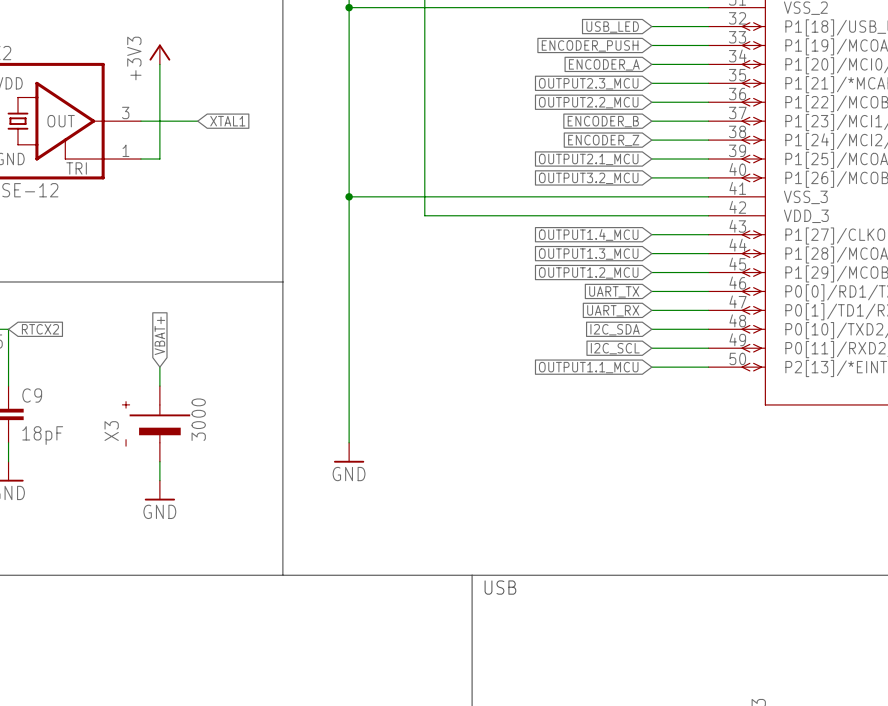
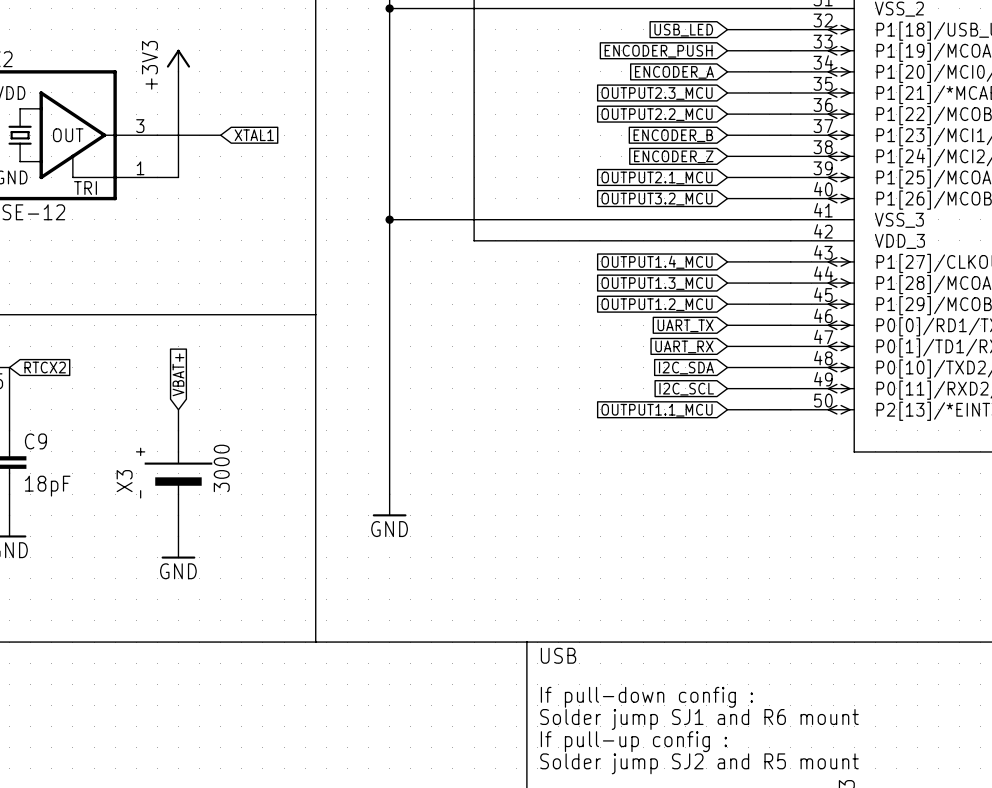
text: none -> If pull-down config : (646, 697)
text: none -> Solder jump SJ1 and R6 mount (699, 719)
text: none -> If pull-up config : (633, 741)
text: none -> Solder jump SJ2 and R5 mount (699, 763)

